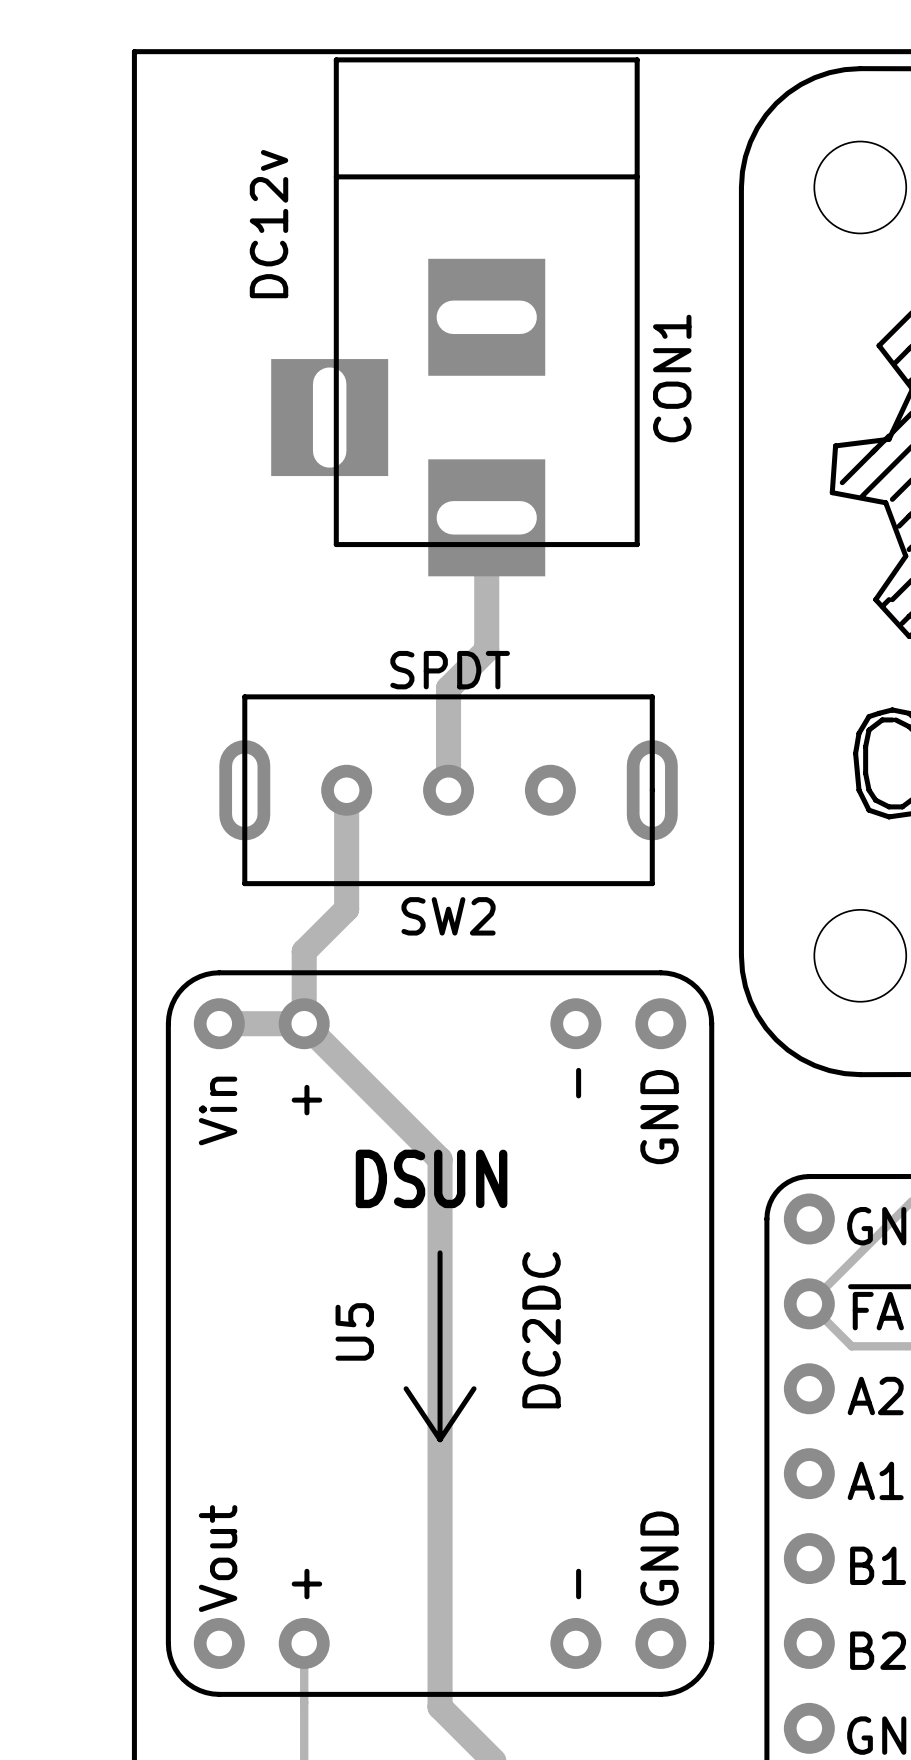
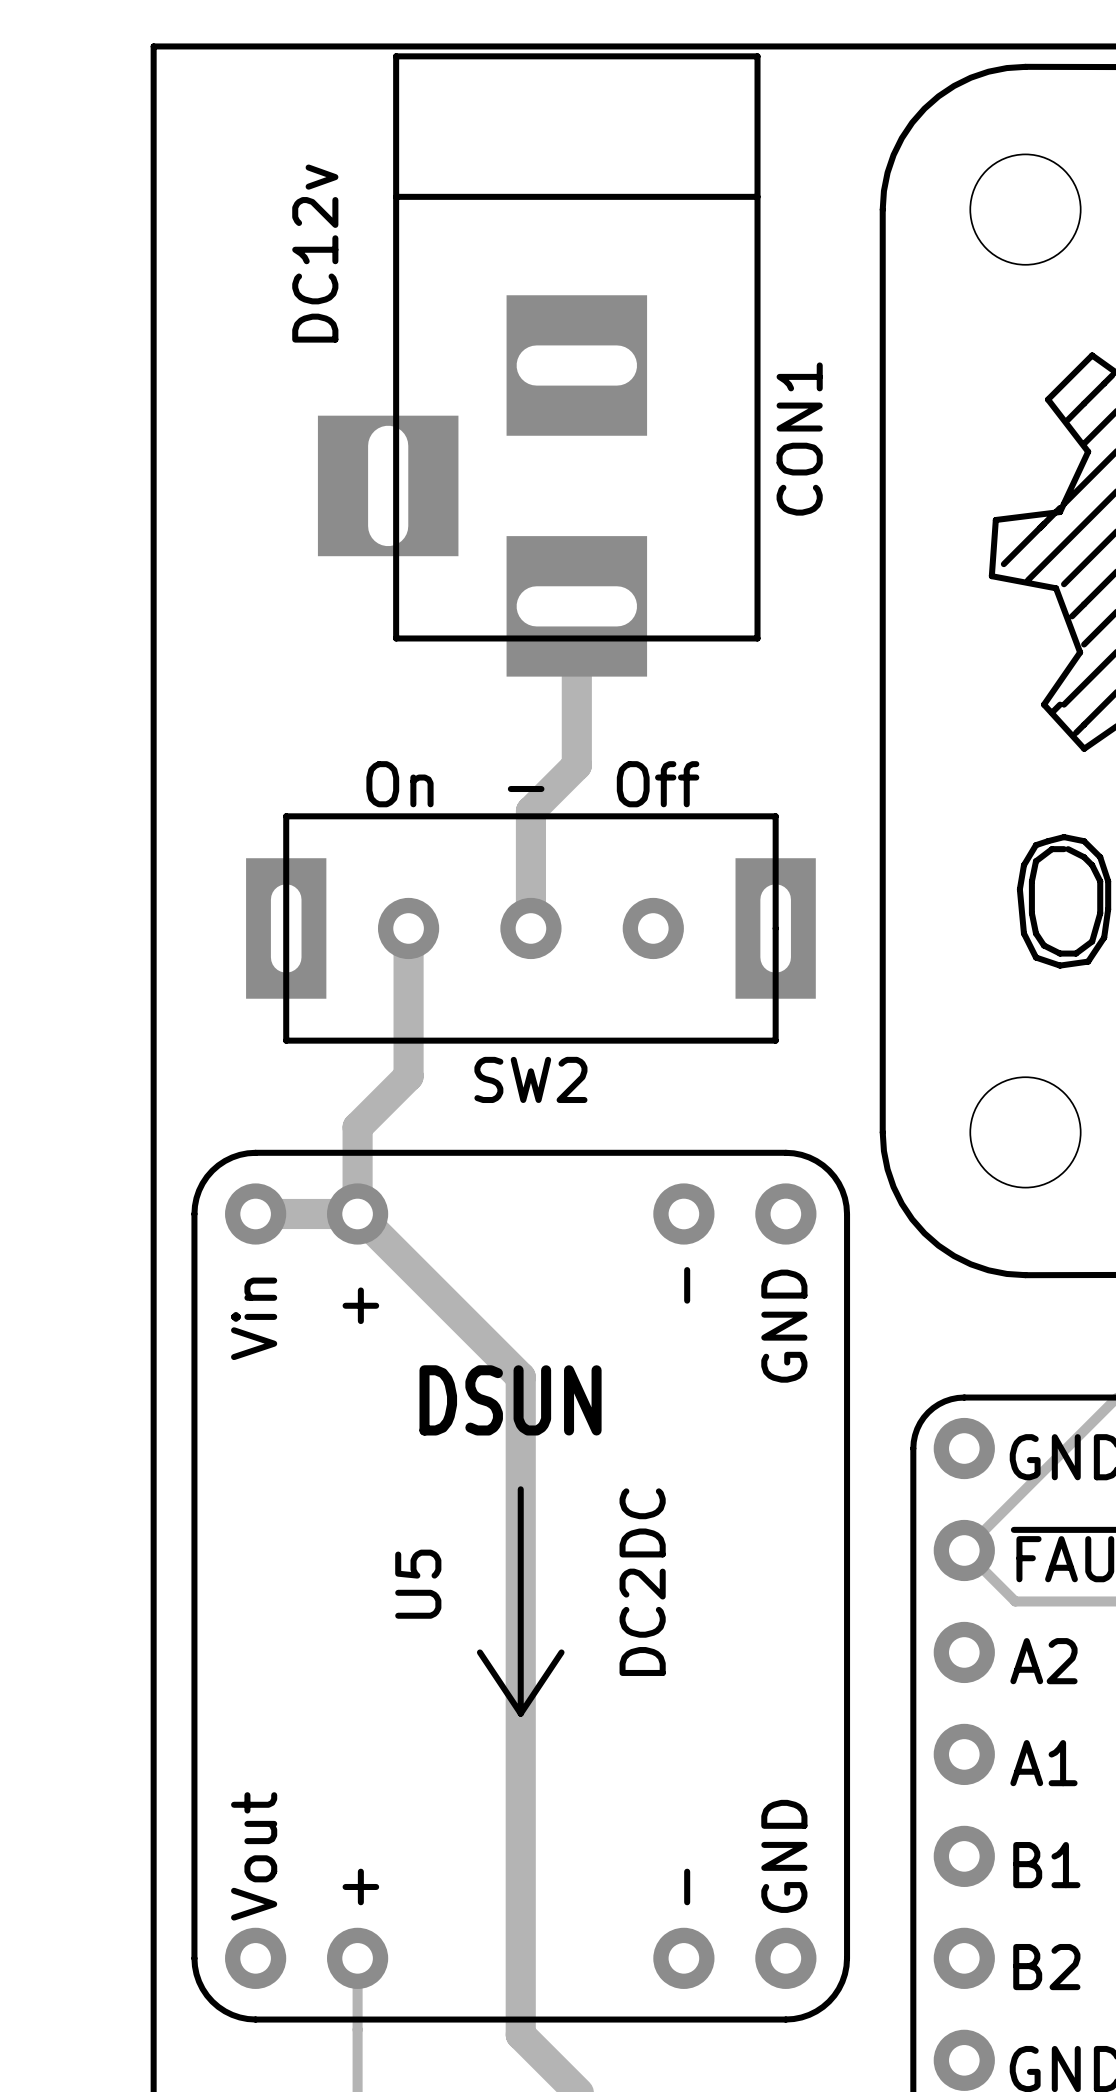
SW2 value: SPDT (450, 670) -> On - Off (532, 784)
SW2 footprint: [219, 694, 678, 887] -> [246, 813, 816, 1044]

